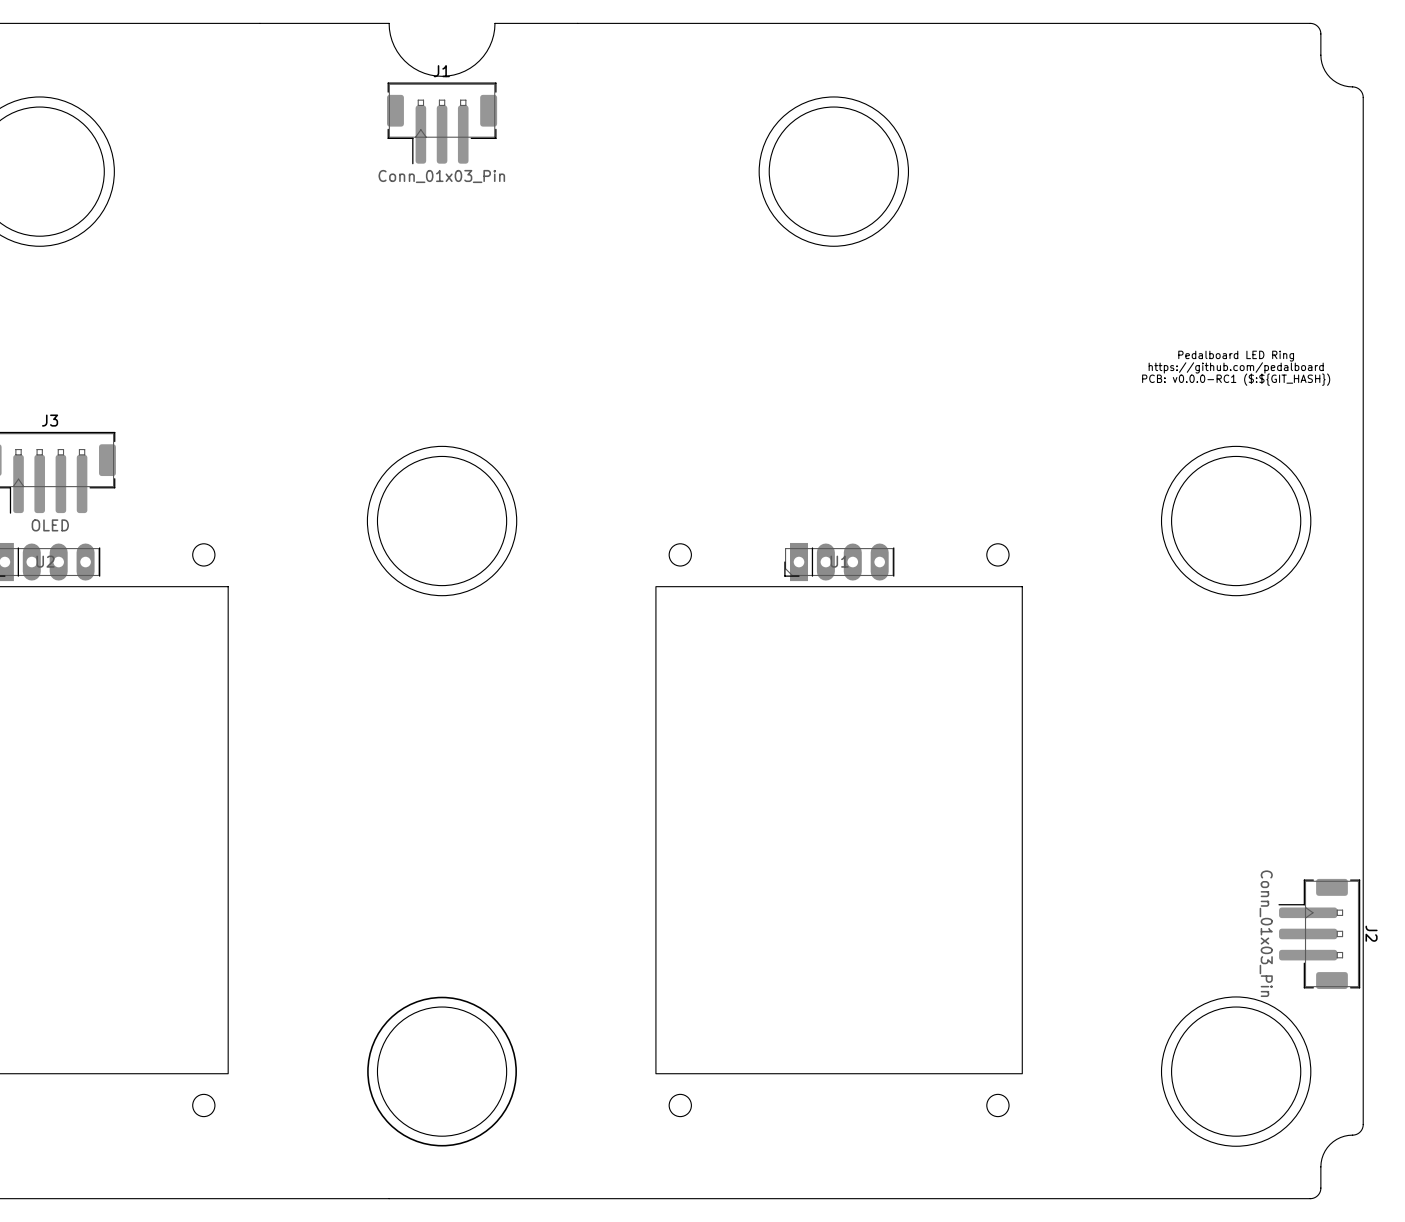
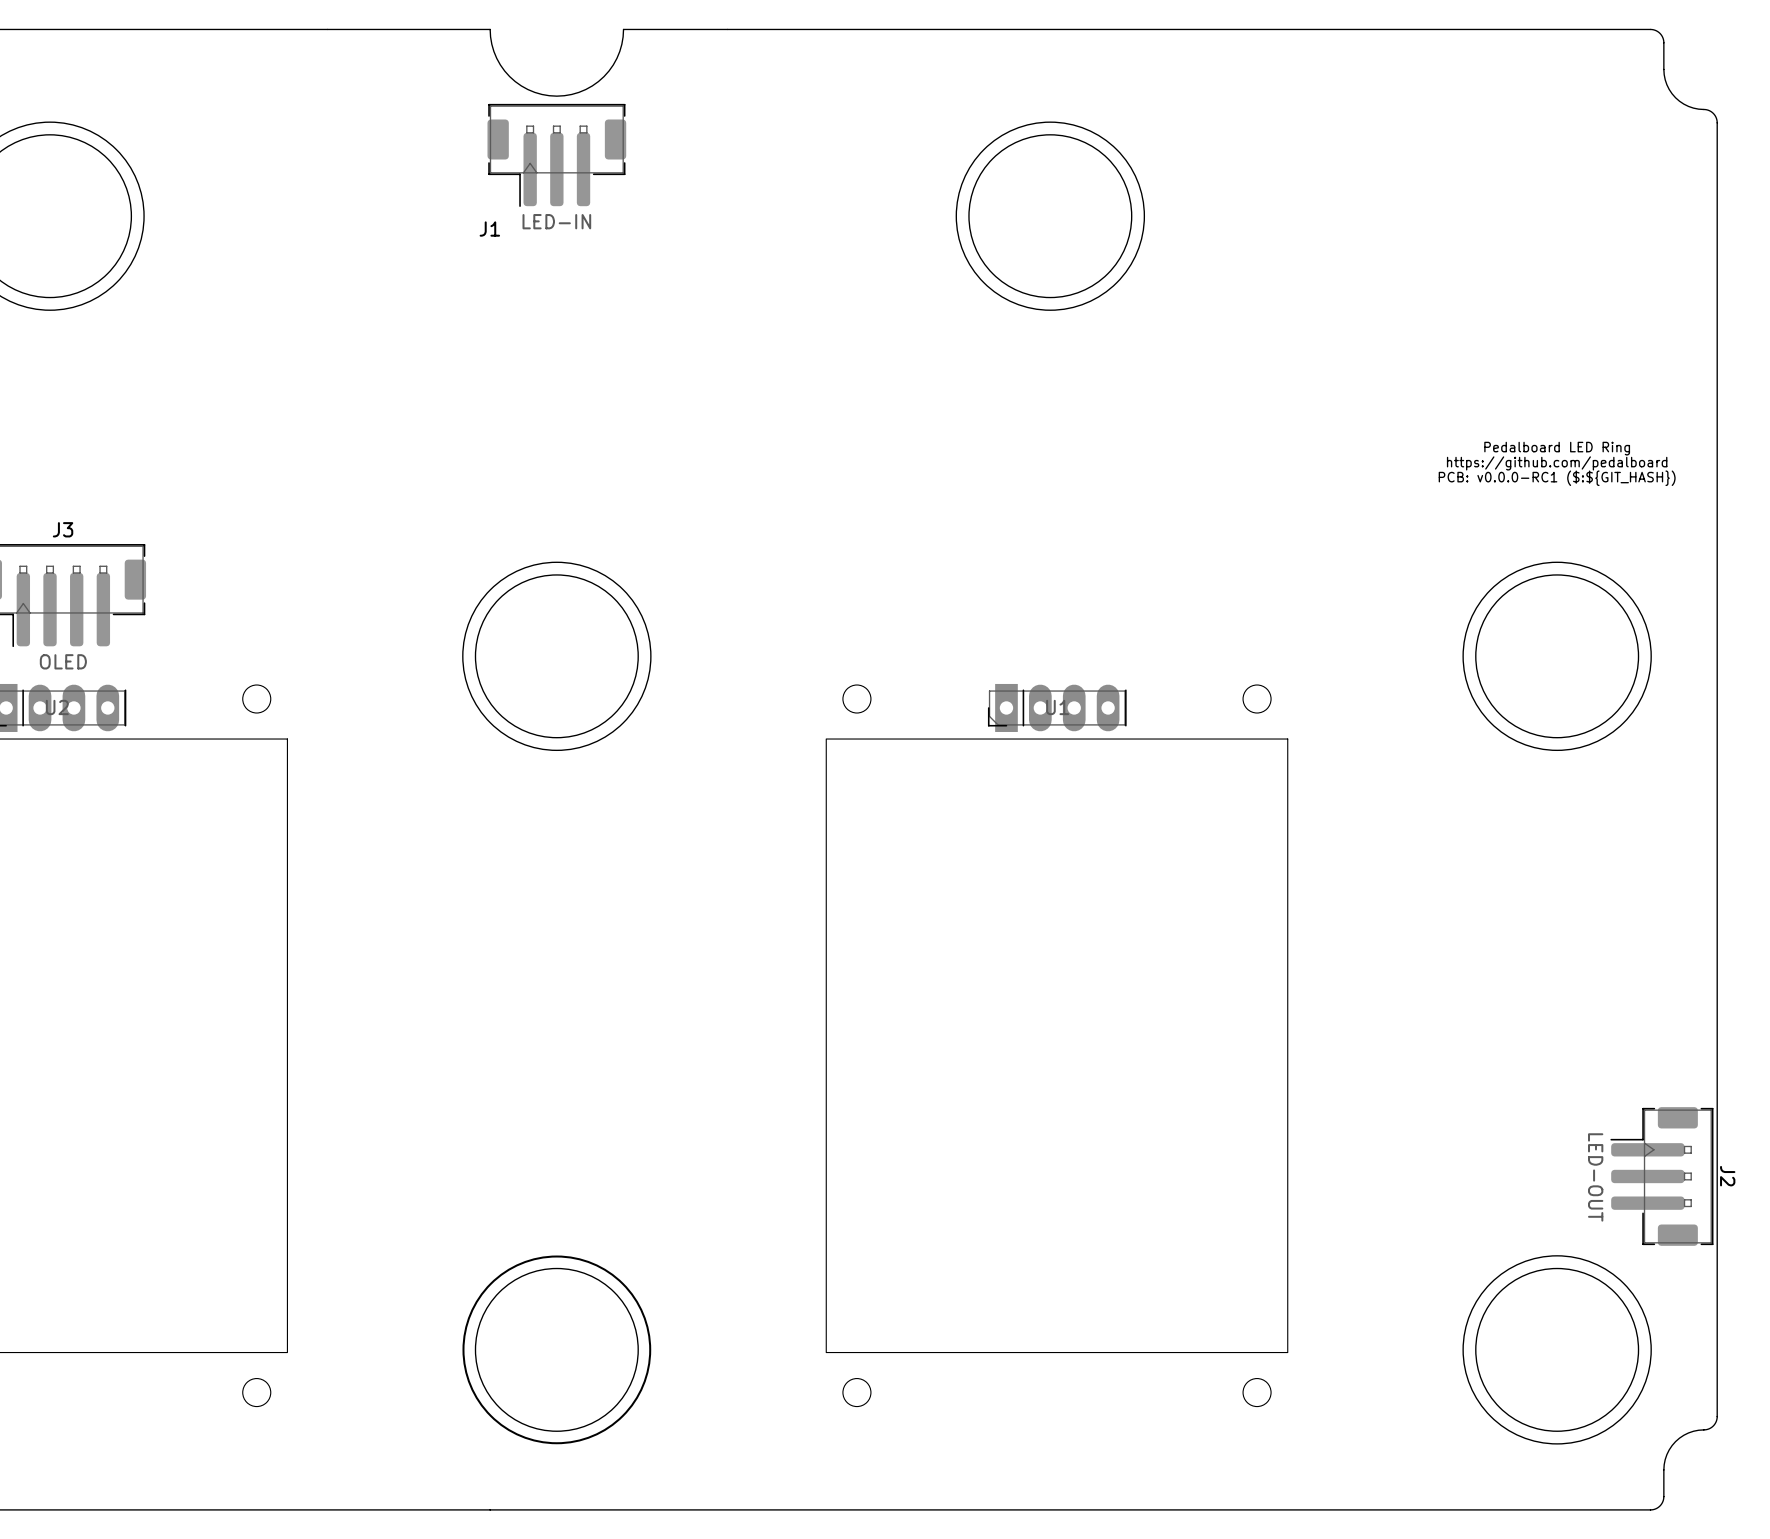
J1 name position: J1 (441, 71) -> J1 (489, 229)
J1 value: Conn_01x03_Pin (441, 176) -> LED-IN (556, 221)
J2 value: Conn_01x03_Pin (1266, 933) -> LED-OUT (1595, 1177)

